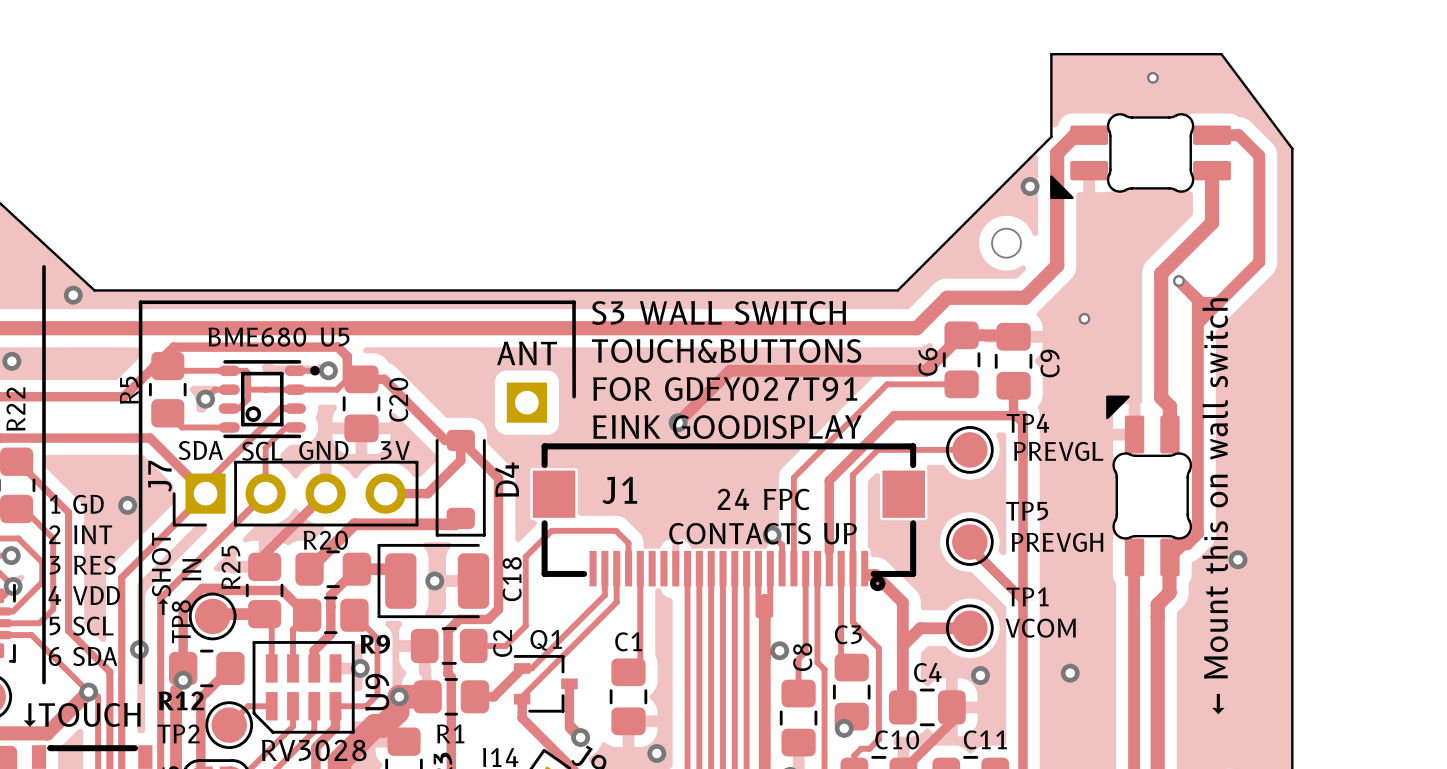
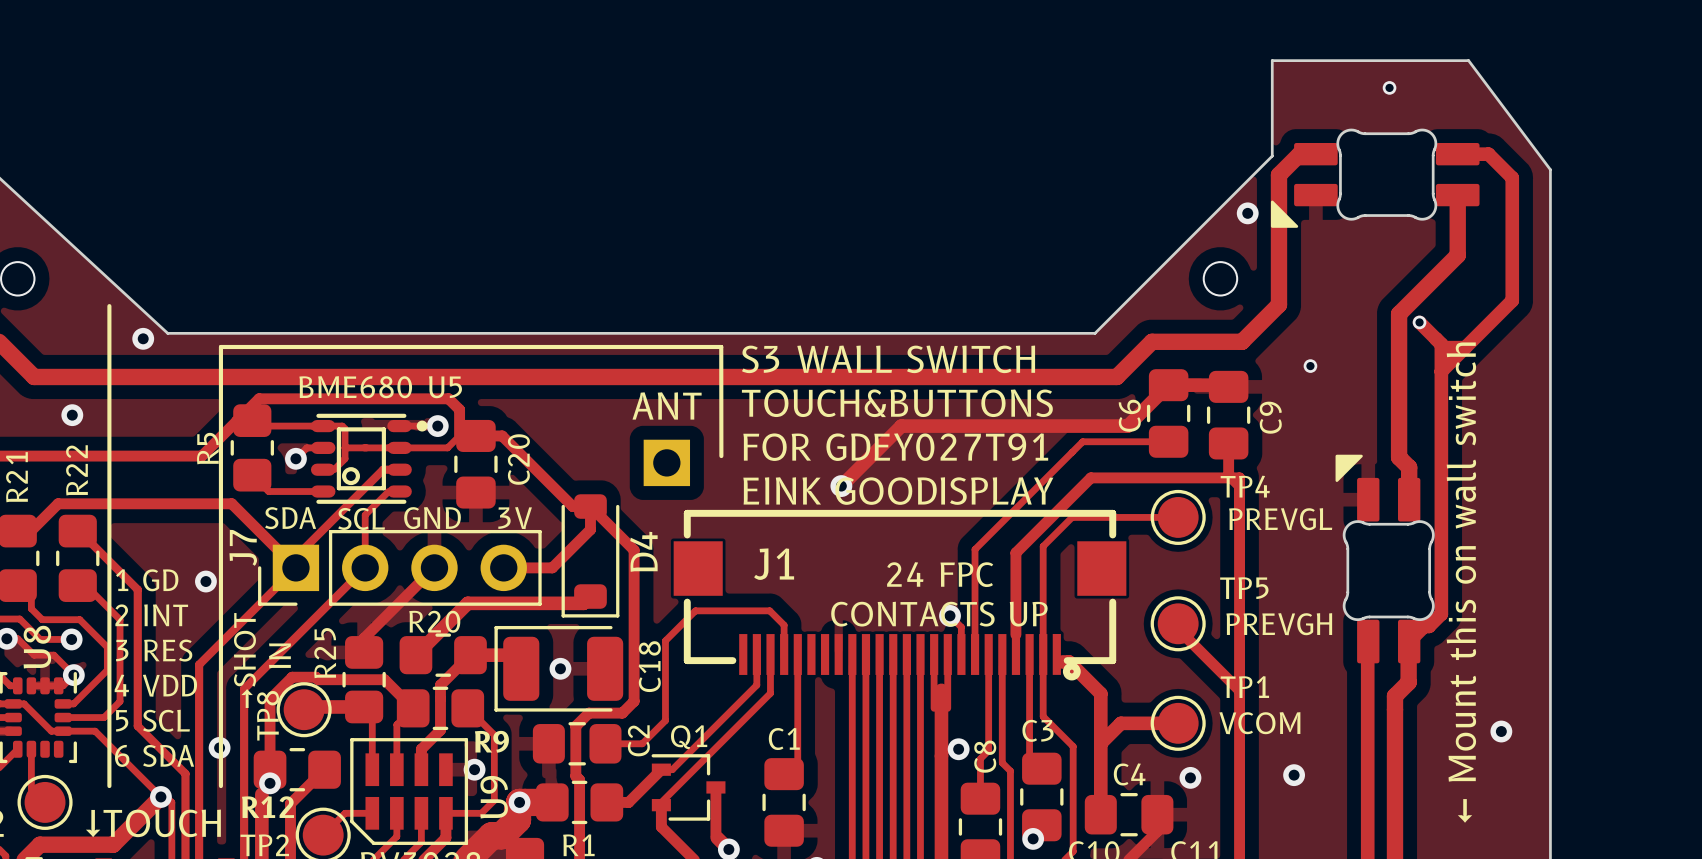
via position: (1238, 559) -> (1501, 731)

